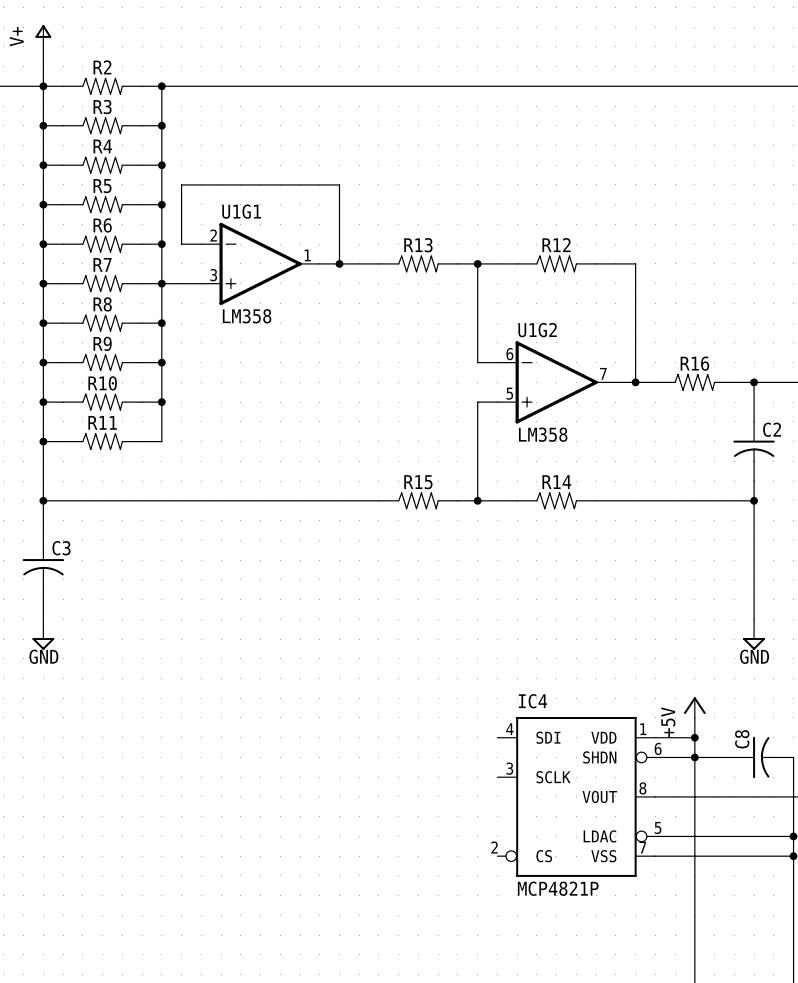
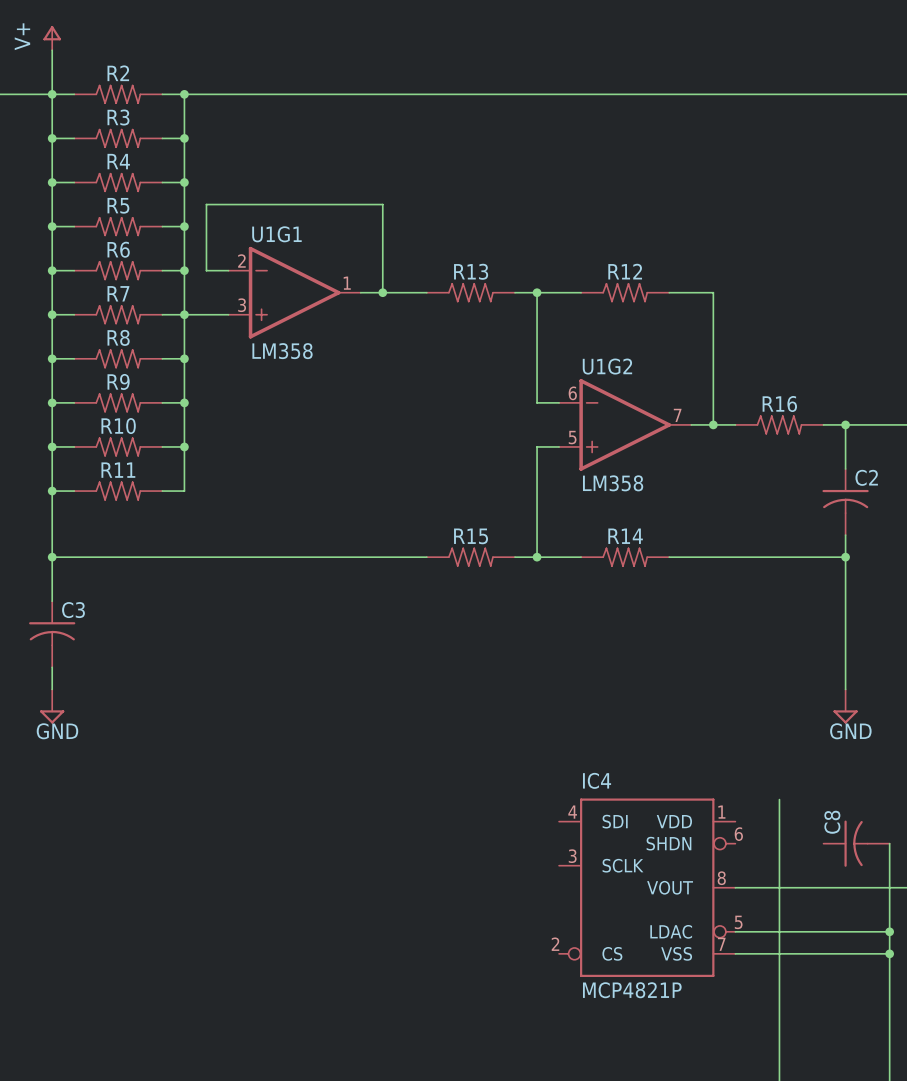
power symbol: +5V (694, 707) -> none
wire: (655, 737) (694, 737) -> none
junction: (694, 737) -> none
wire: (655, 757) (734, 757) -> none
junction: (694, 757) -> none

